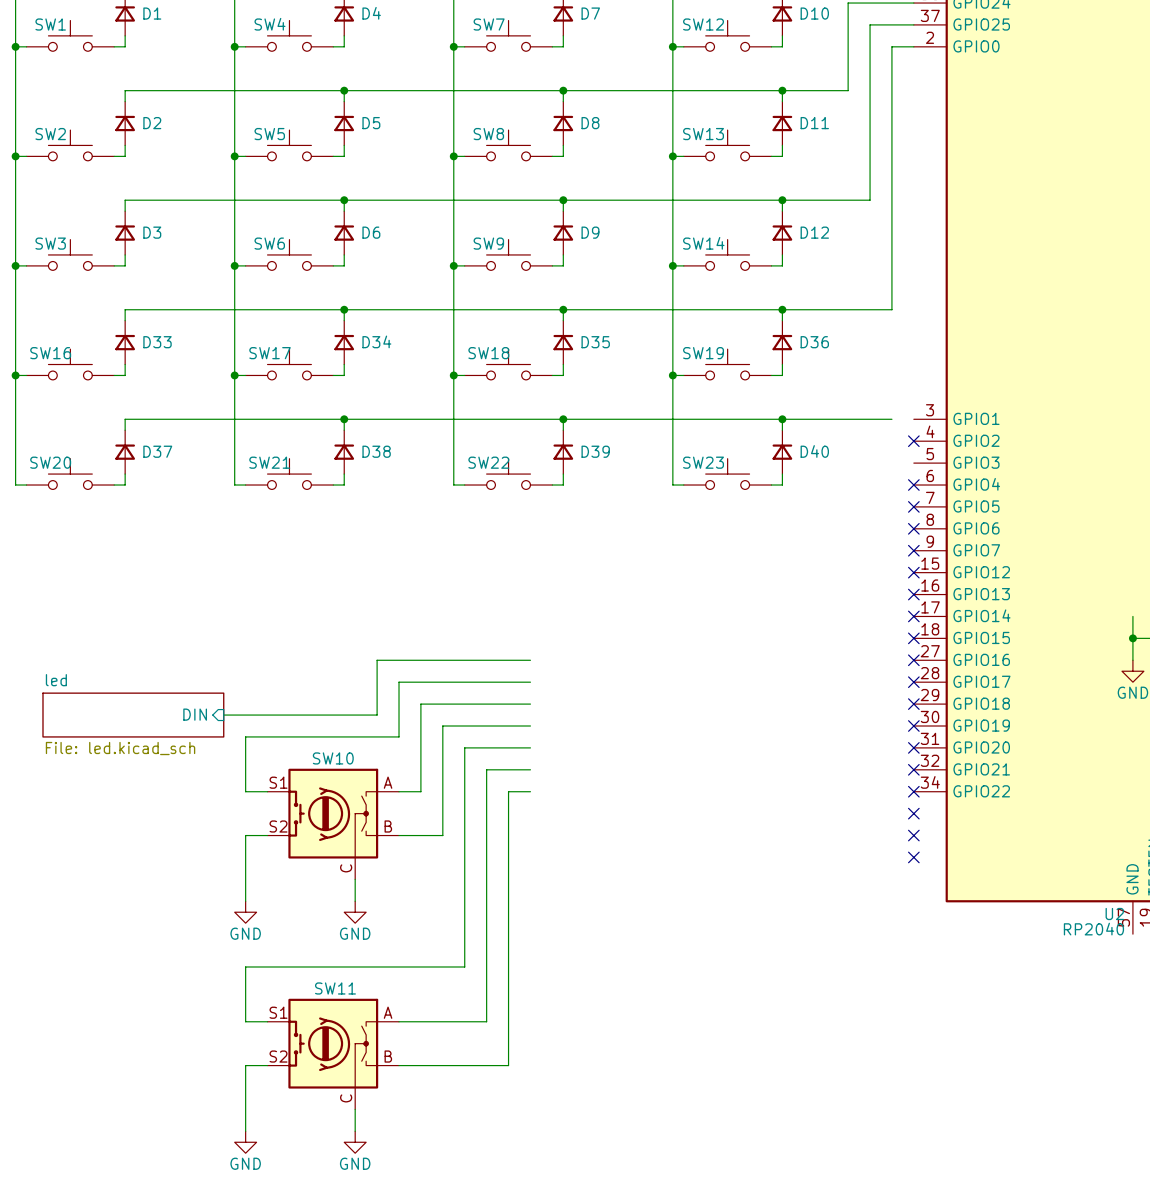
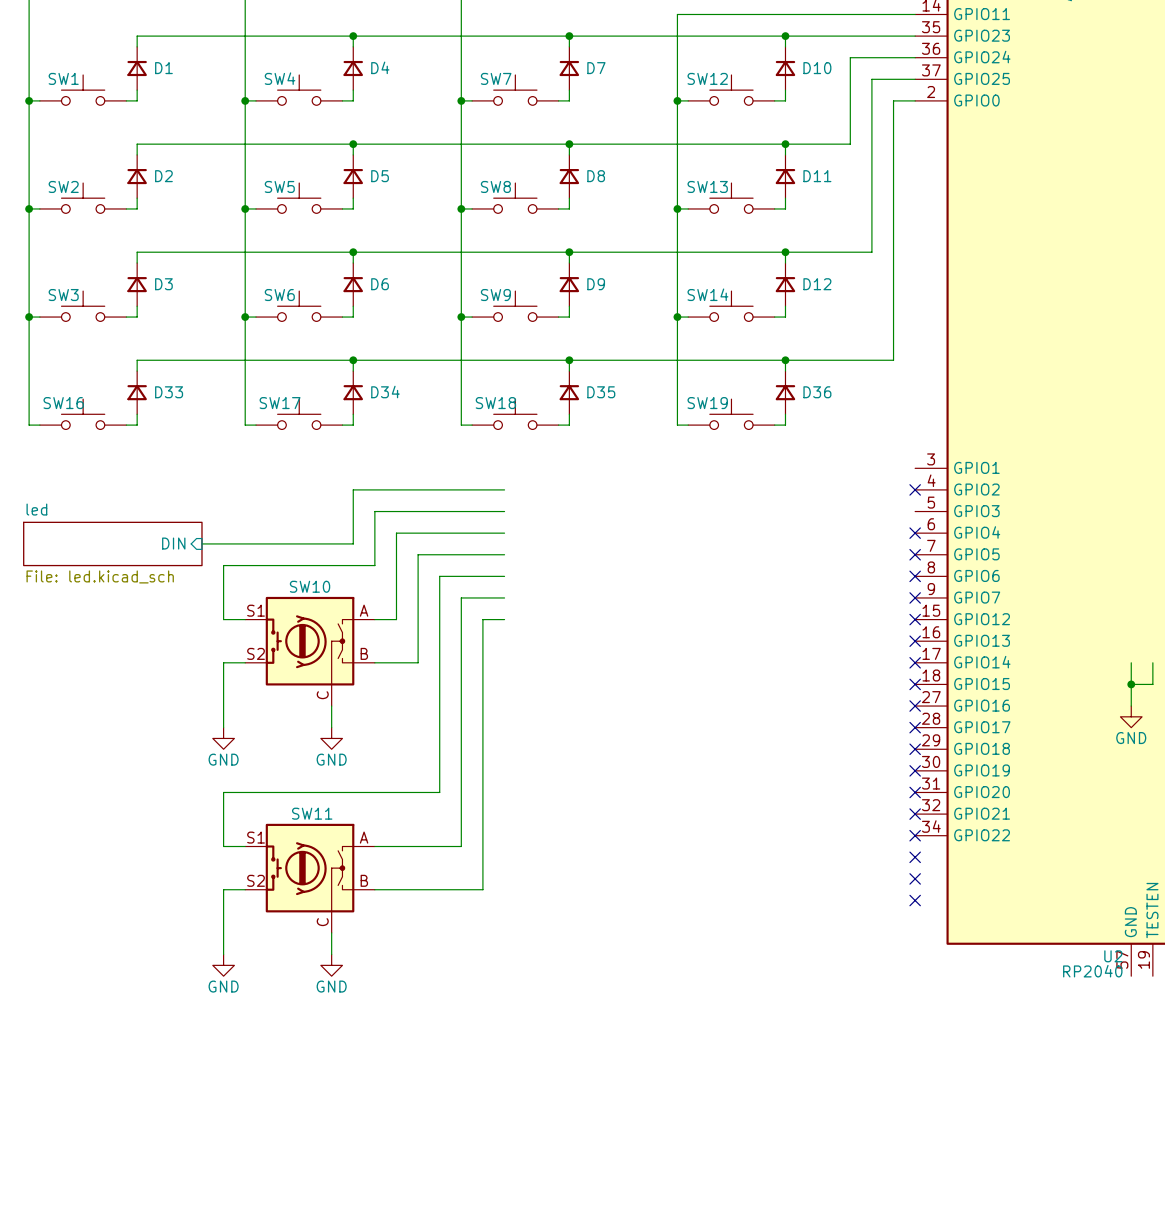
wire: (15, 375) (15, 485) (26, 485) -> none
junction: (15, 375) -> none
wire: (234, 375) (234, 485) (245, 485) -> none
junction: (234, 375) -> none
wire: (453, 375) (453, 485) -> (374, 619) (396, 619) (396, 533) (461, 533)
junction: (453, 375) -> none
wire: (672, 375) (672, 485) (683, 485) -> none
junction: (672, 375) -> none
wire: (344, 419) (344, 430) -> none
junction: (344, 419) -> none
wire: (563, 419) (563, 430) -> none
junction: (563, 419) -> none
wire: (782, 419) (782, 430) -> none
junction: (782, 419) -> none
wire: (891, 419) (125, 419) (125, 430) -> none
wire: none -> (504, 489) (353, 489) (353, 522)
D37: (125, 452) -> none
D38: (344, 452) -> none
D39: (563, 452) -> none
D40: (782, 452) -> none
wire: none -> (504, 511) (374, 511) (374, 565) (223, 565) (223, 619) (245, 619)
SW20: (70, 474) -> none
wire: (125, 474) (125, 485) (114, 485) -> none
SW21: (289, 474) -> none
SW22: (508, 474) -> none
wire: (563, 474) (563, 485) (552, 485) -> none
SW23: (727, 474) -> none
wire: (782, 474) (782, 485) (771, 485) -> none
wire: (333, 485) (344, 485) -> (201, 543) (353, 543) (353, 533)
sheet led: none -> File: led.kicad_sch (112, 543)
sheet pin: none -> DIN (173, 543)
wire: none -> (504, 554) (418, 554) (418, 662) (374, 662)
wire: none -> (504, 576) (439, 576) (439, 792) (223, 792) (223, 846) (245, 846)
wire: none -> (504, 597) (461, 597) (461, 846) (374, 846)
wire: none -> (504, 619) (482, 619) (482, 889) (374, 889)
wire: none -> (245, 662) (223, 662) (223, 727)
wire: none -> (331, 706) (331, 727)
wire: (530, 660) (377, 660) (377, 715) (223, 715) -> none
wire: (530, 682) (399, 682) (399, 736) (245, 736) (245, 791) (267, 791) -> none
power symbol: none -> GND (223, 738)
power symbol: none -> GND (331, 738)
wire: (530, 704) (420, 704) (420, 791) (399, 791) -> none
sheet pin: DIN (195, 714) -> none
sheet led: File: led.kicad_sch (133, 715) -> none
wire: (530, 726) (442, 726) (442, 835) (399, 835) -> none
wire: (530, 747) (464, 747) (464, 966) (245, 966) (245, 1021) (267, 1021) -> none
wire: (530, 769) (486, 769) (486, 1021) (399, 1021) -> none
wire: (530, 791) (508, 791) (508, 1065) (399, 1065) -> none
SW10 position: (333, 824) -> (310, 651)
wire: (267, 835) (245, 835) (245, 901) -> (245, 889) (223, 889) (223, 954)
wire: (355, 879) (355, 901) -> (331, 932) (331, 954)
power symbol position: GND (245, 912) -> GND (223, 965)
power symbol position: GND (355, 912) -> GND (331, 965)
SW11 position: (333, 1054) -> (310, 878)
wire: (267, 1065) (245, 1065) (245, 1131) -> none
wire: (355, 1109) (355, 1131) -> none
power symbol: GND (245, 1142) -> none
power symbol: GND (355, 1142) -> none

